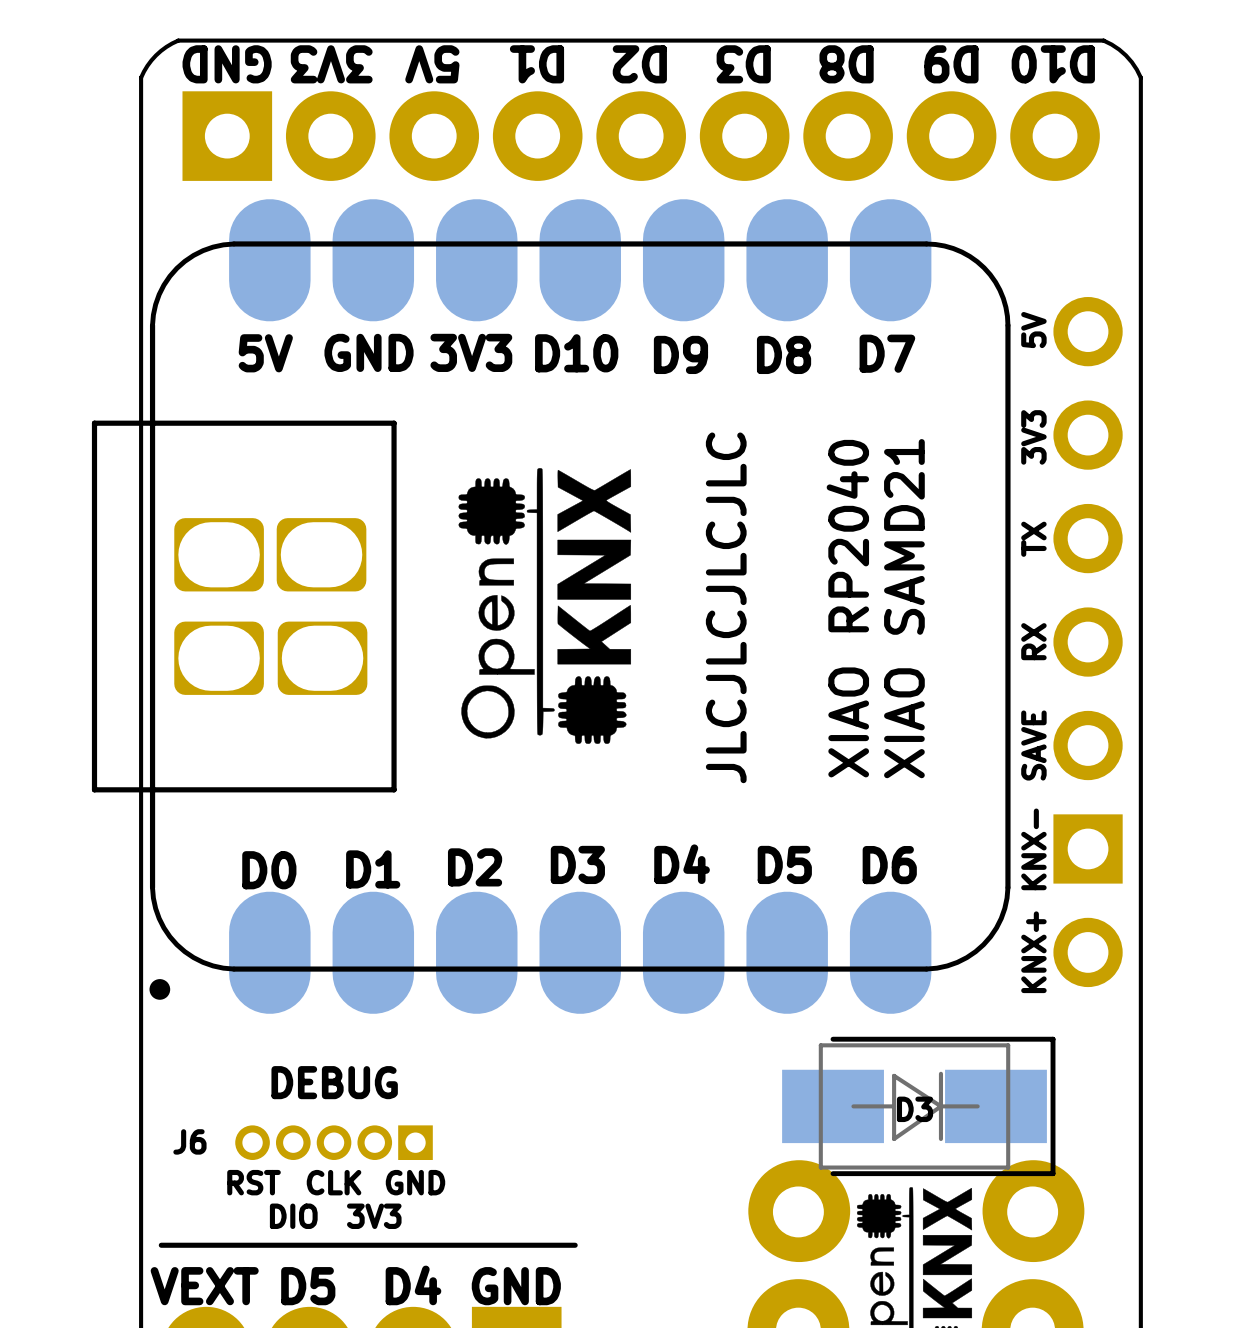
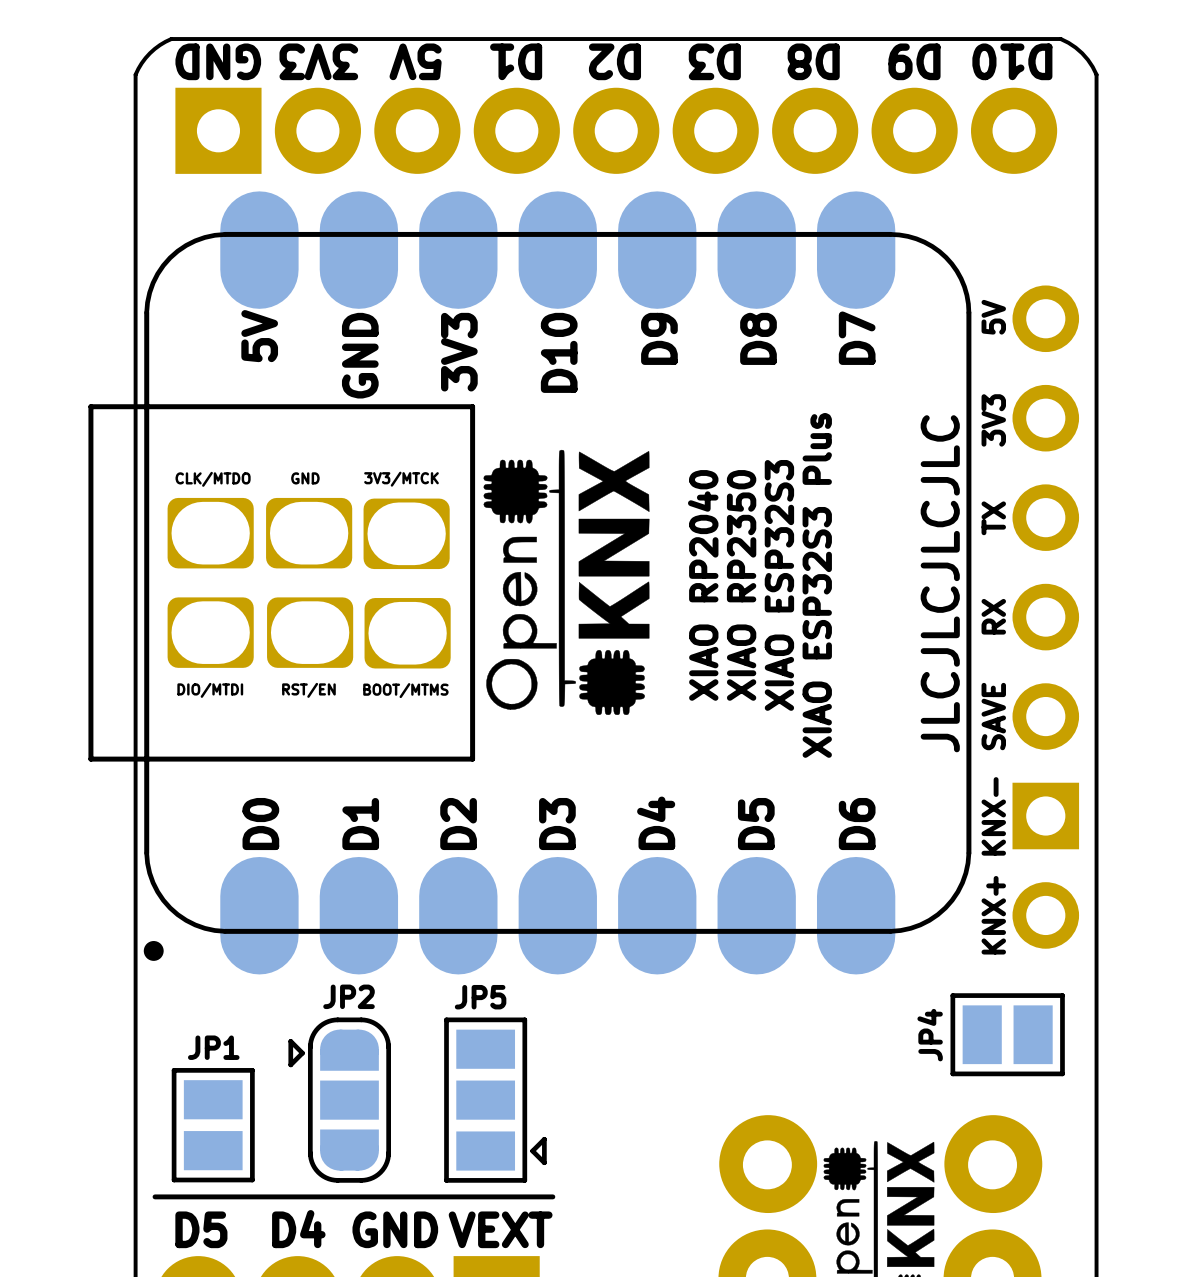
part footprint: [91, 199, 1011, 1014] -> [88, 191, 972, 975]
drawing position: (544, 605) -> (566, 582)
text position: JLCJLCJLCJLC (726, 607) -> JLCJLCJLCJLC (940, 583)
text: XIAO RP2040 (847, 608) -> XIAO ESP32S3 Plus (817, 585)
text: XIAO SAMD21 (904, 608) -> none
text: none -> XIAO RP2040 (703, 585)
text: none -> XIAO RP2350 (741, 585)
text: none -> XIAO ESP32S3 (779, 585)
JP4: none -> (1007, 1034)
D3: (918, 1106) -> none
J6: (334, 1142) -> none
JP2: none -> (339, 1100)
JP5: none -> (495, 1100)
JP1: none -> (213, 1125)
text position: D4 (413, 1285) -> D4 (298, 1229)
text position: VEXT (204, 1286) -> VEXT (500, 1229)
text position: D5 (308, 1286) -> D5 (201, 1229)
text position: GND (516, 1286) -> GND (395, 1229)

